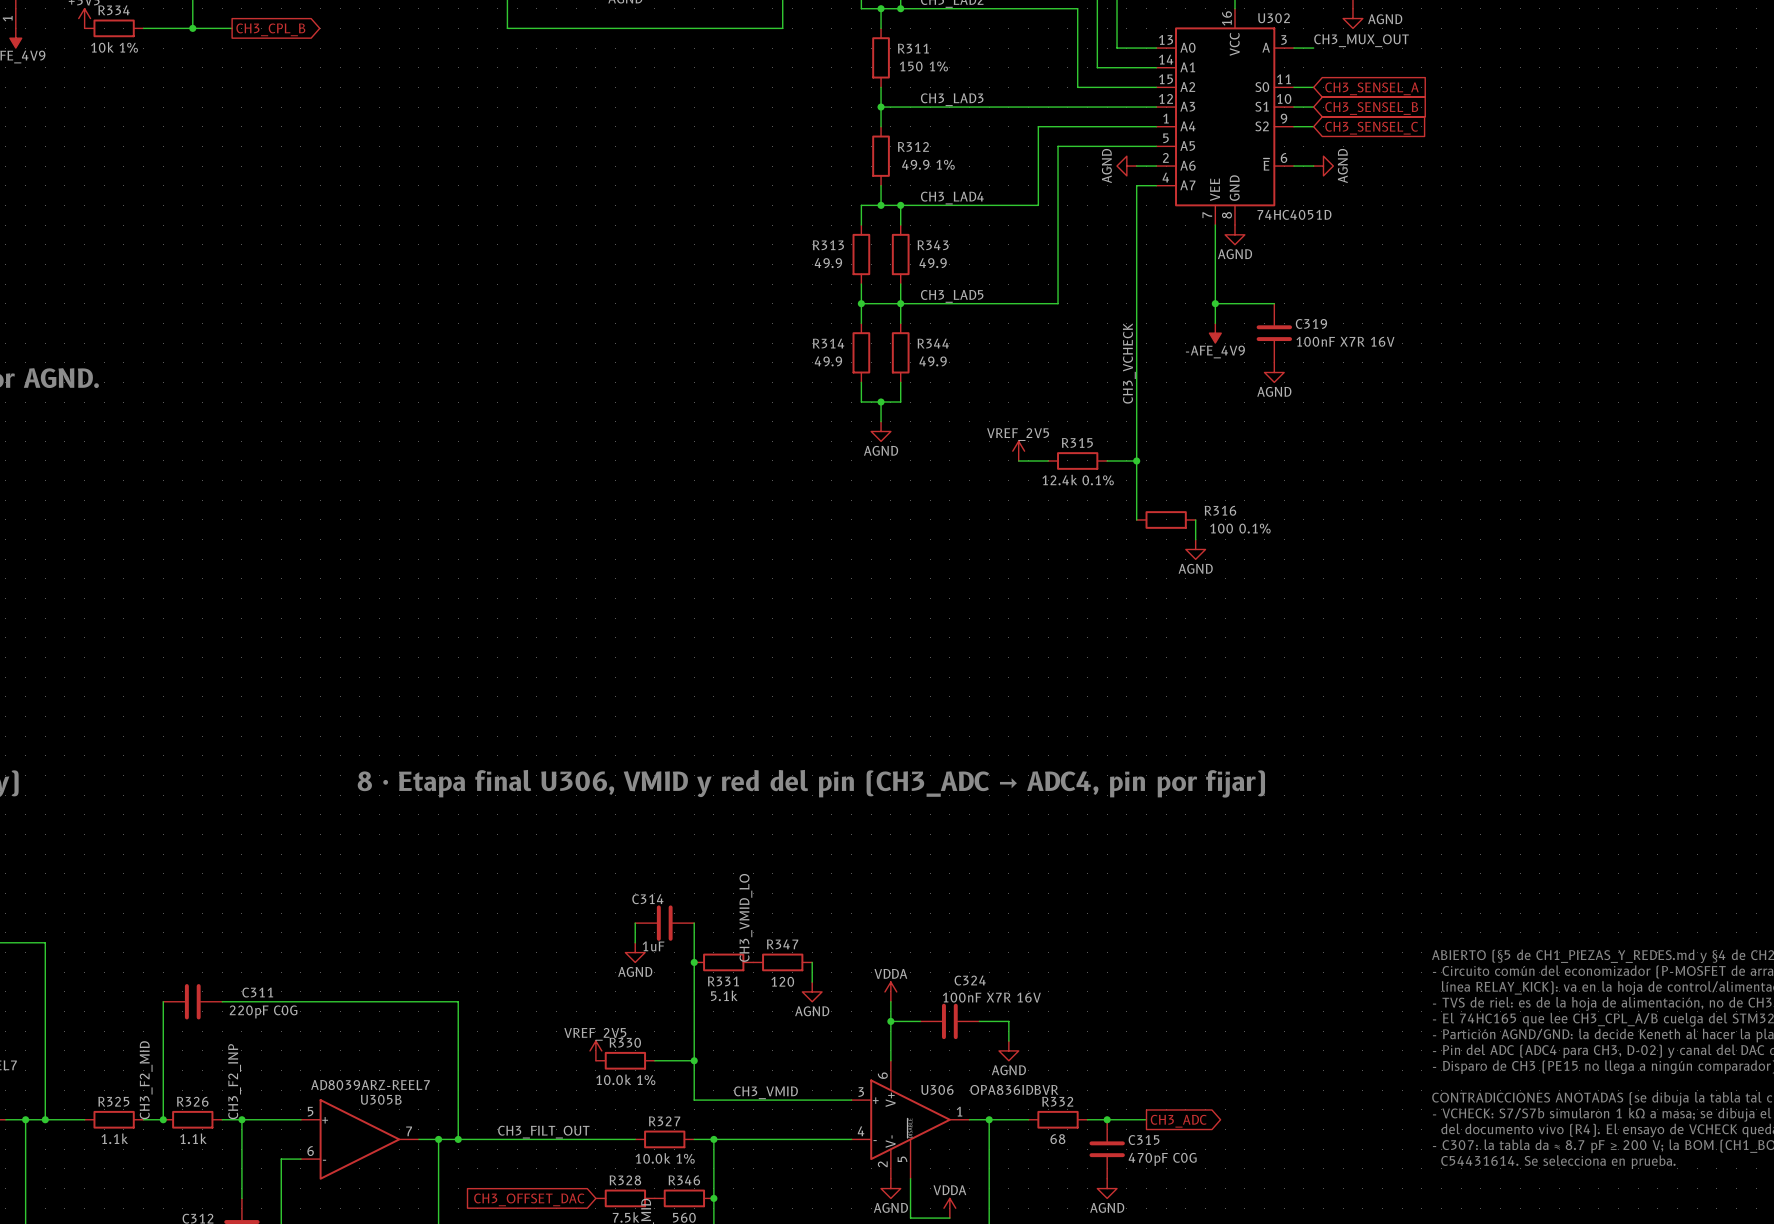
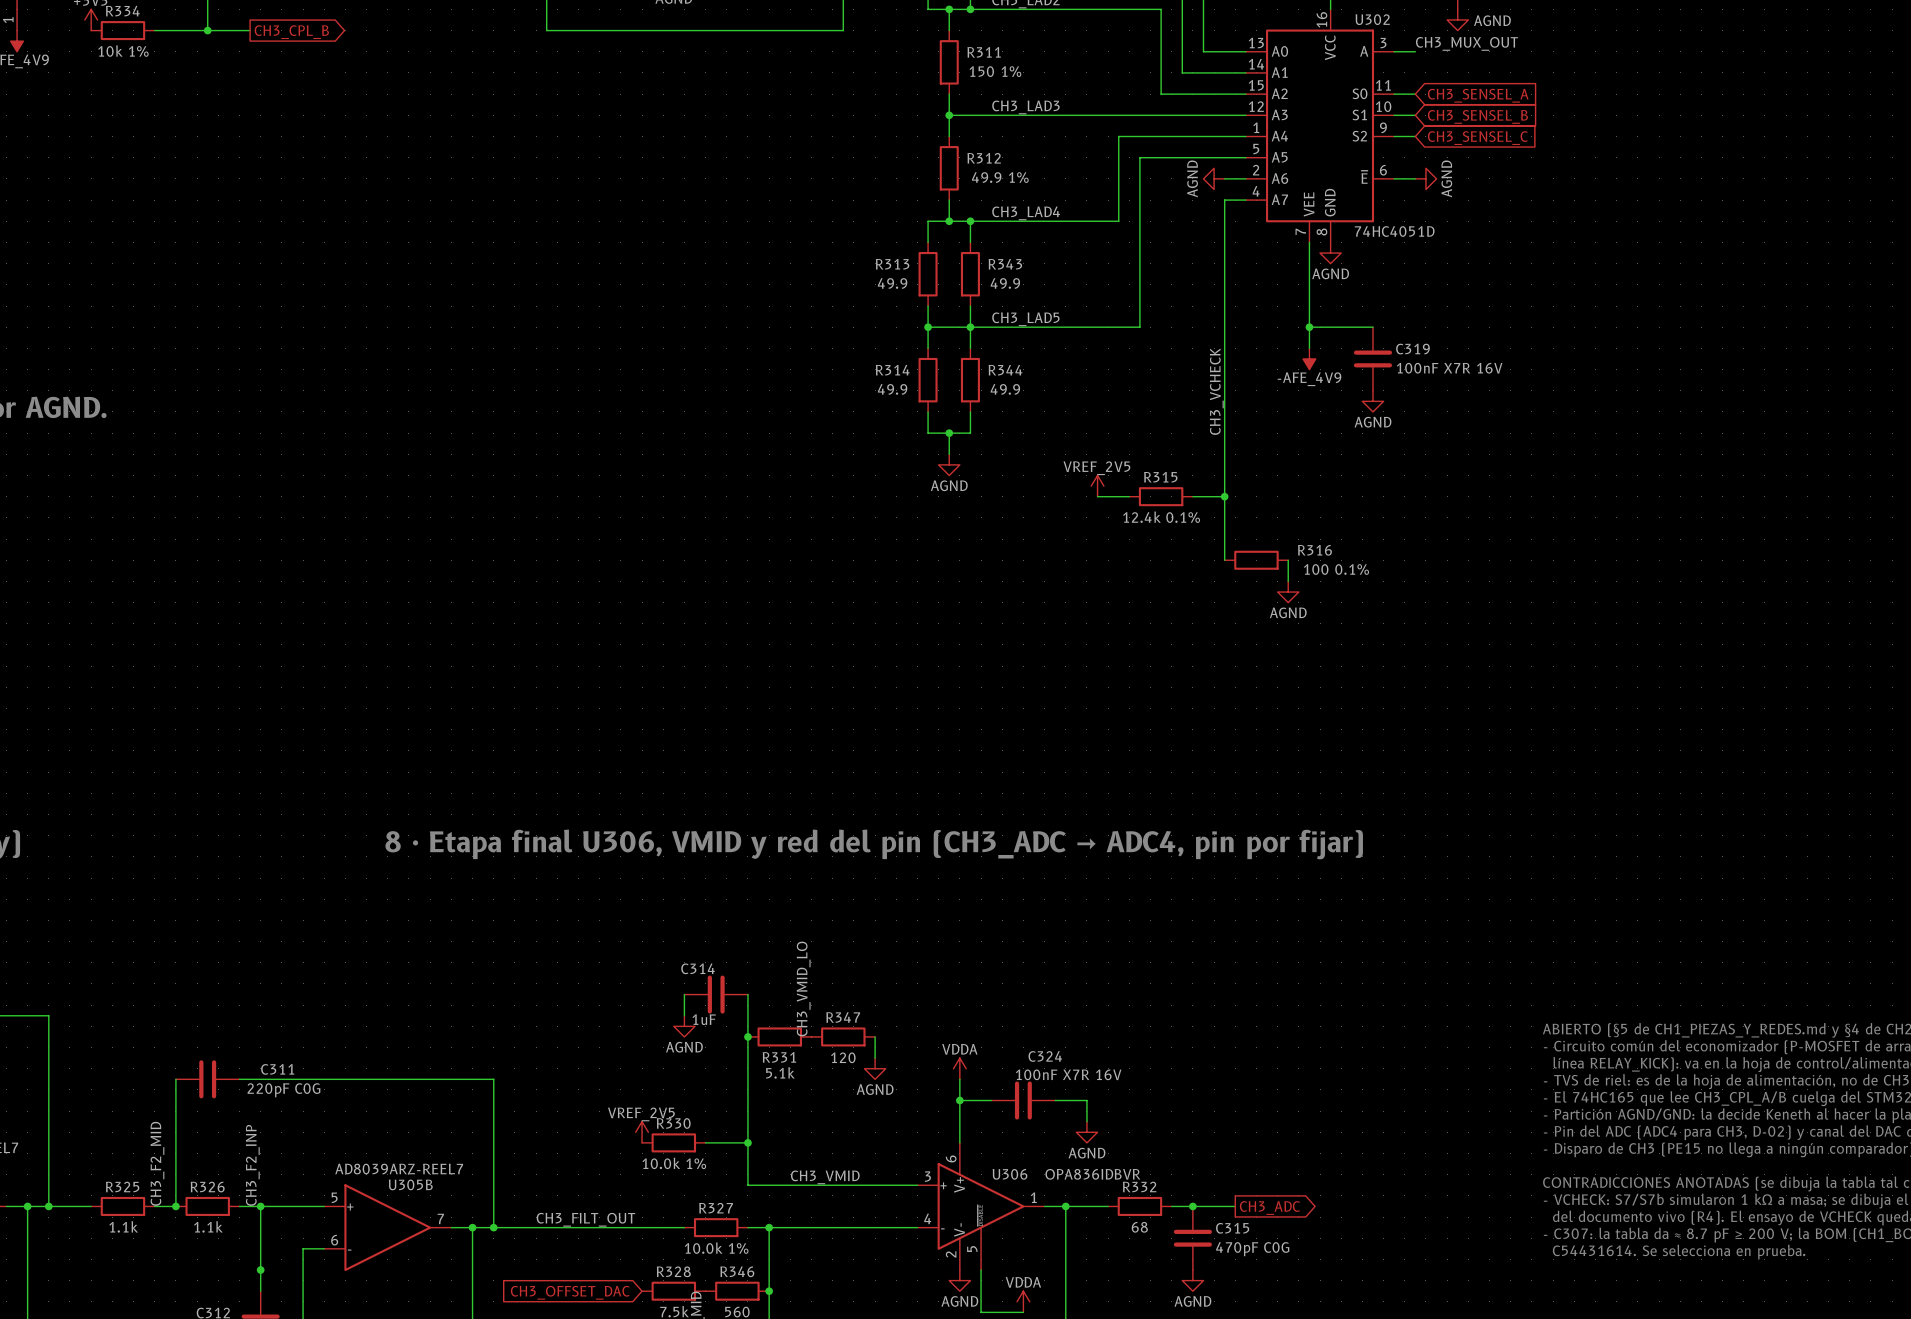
junction: none -> (260, 1270)

